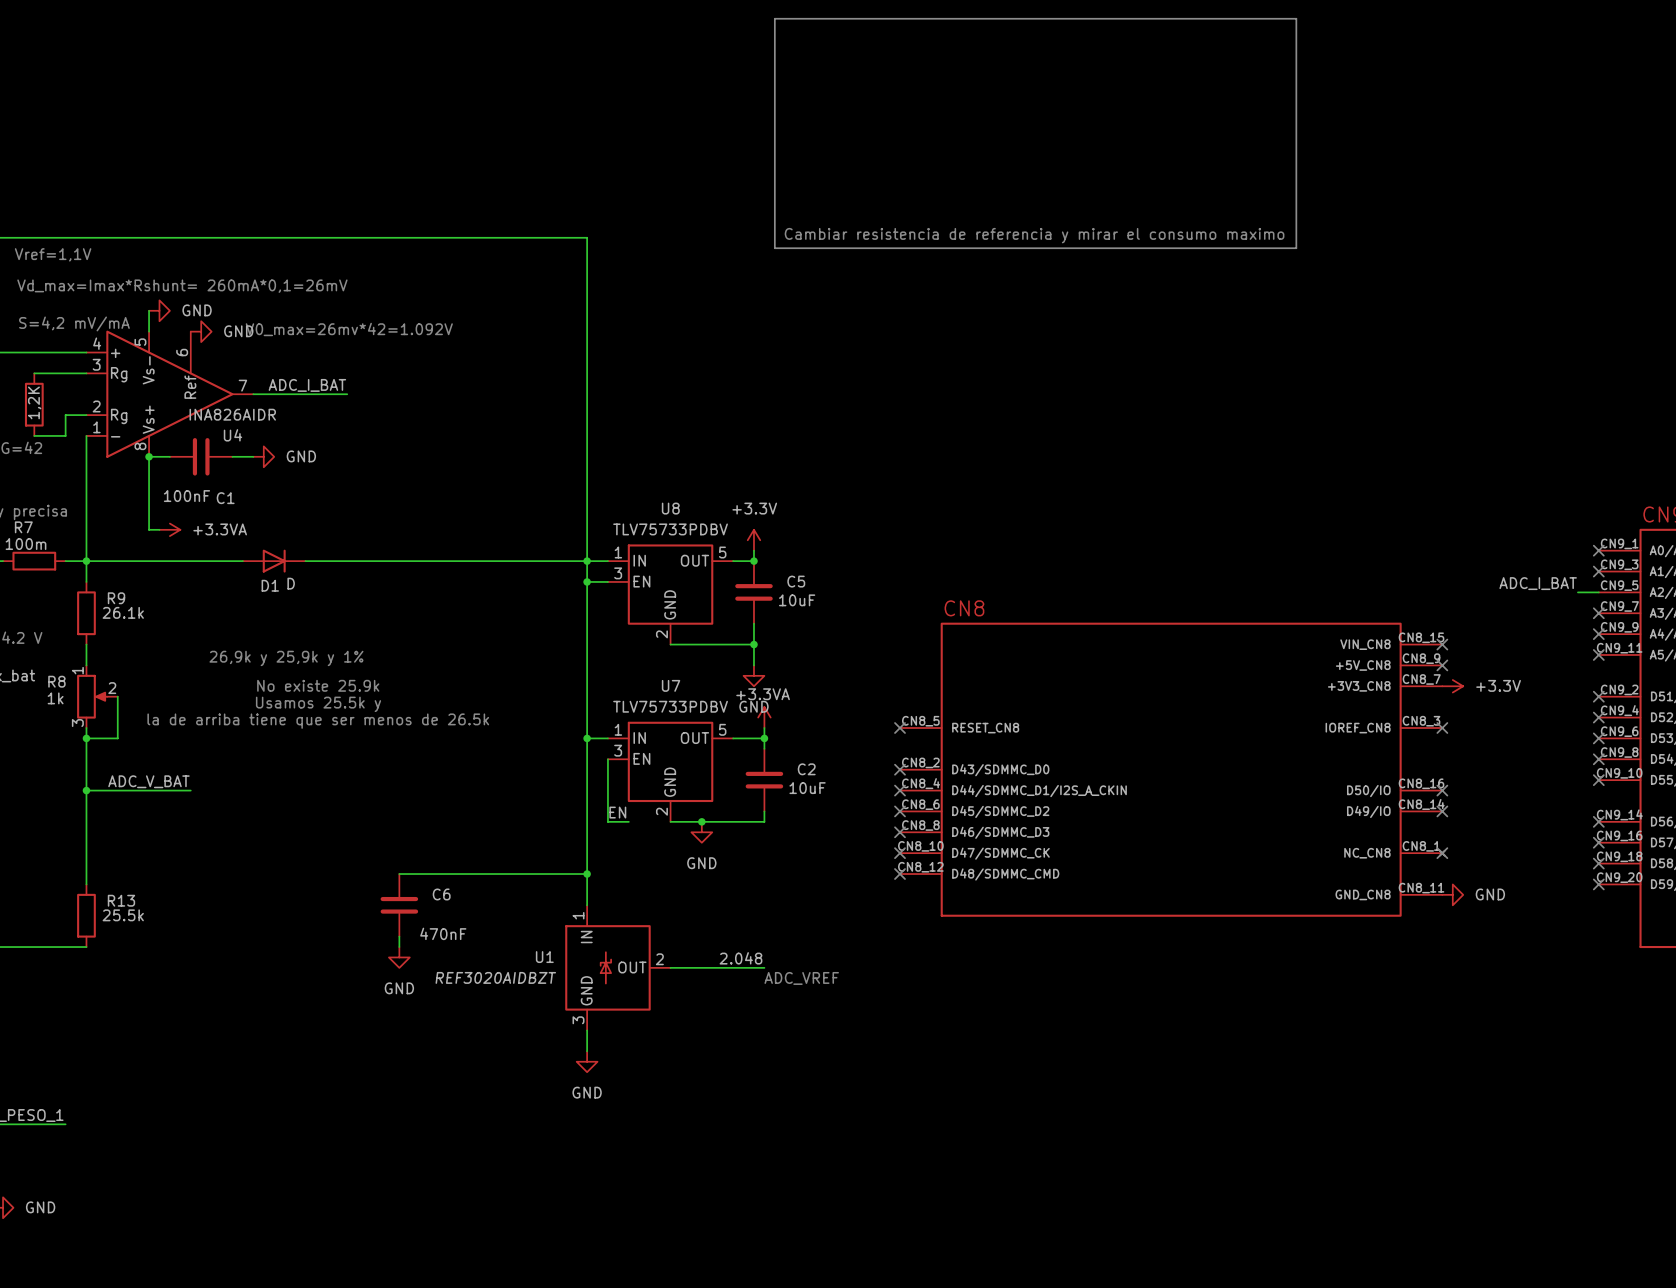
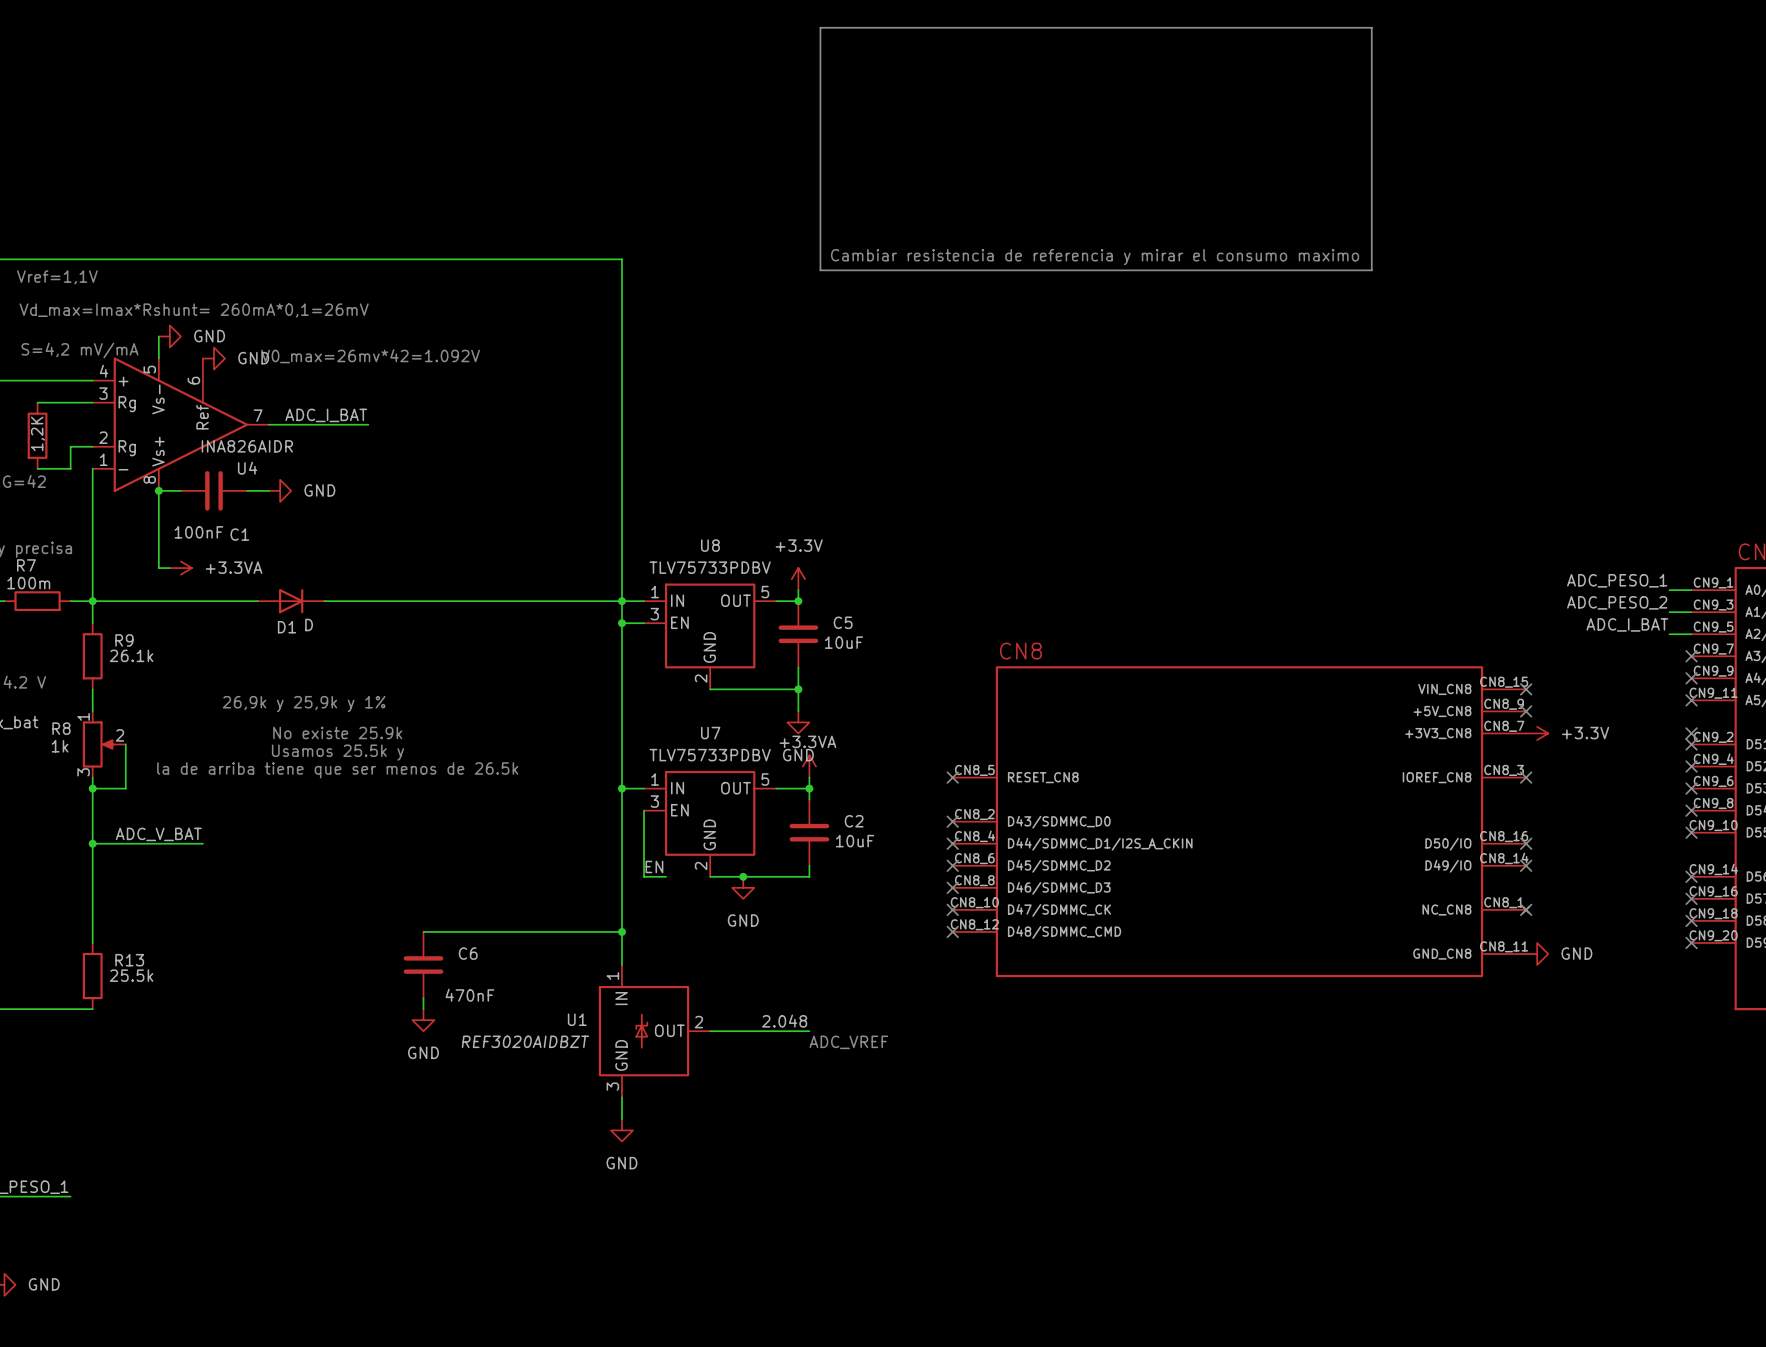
label: none -> ADC_PESO_1 (1617, 580)
wire: none -> (1669, 590) (1691, 590)
no-connect mark: (1598, 550) -> none
label: none -> ADC_PESO_2 (1617, 602)
wire: none -> (1669, 612) (1691, 612)
no-connect mark: (1598, 571) -> none
no-connect mark: none -> (1691, 733)

